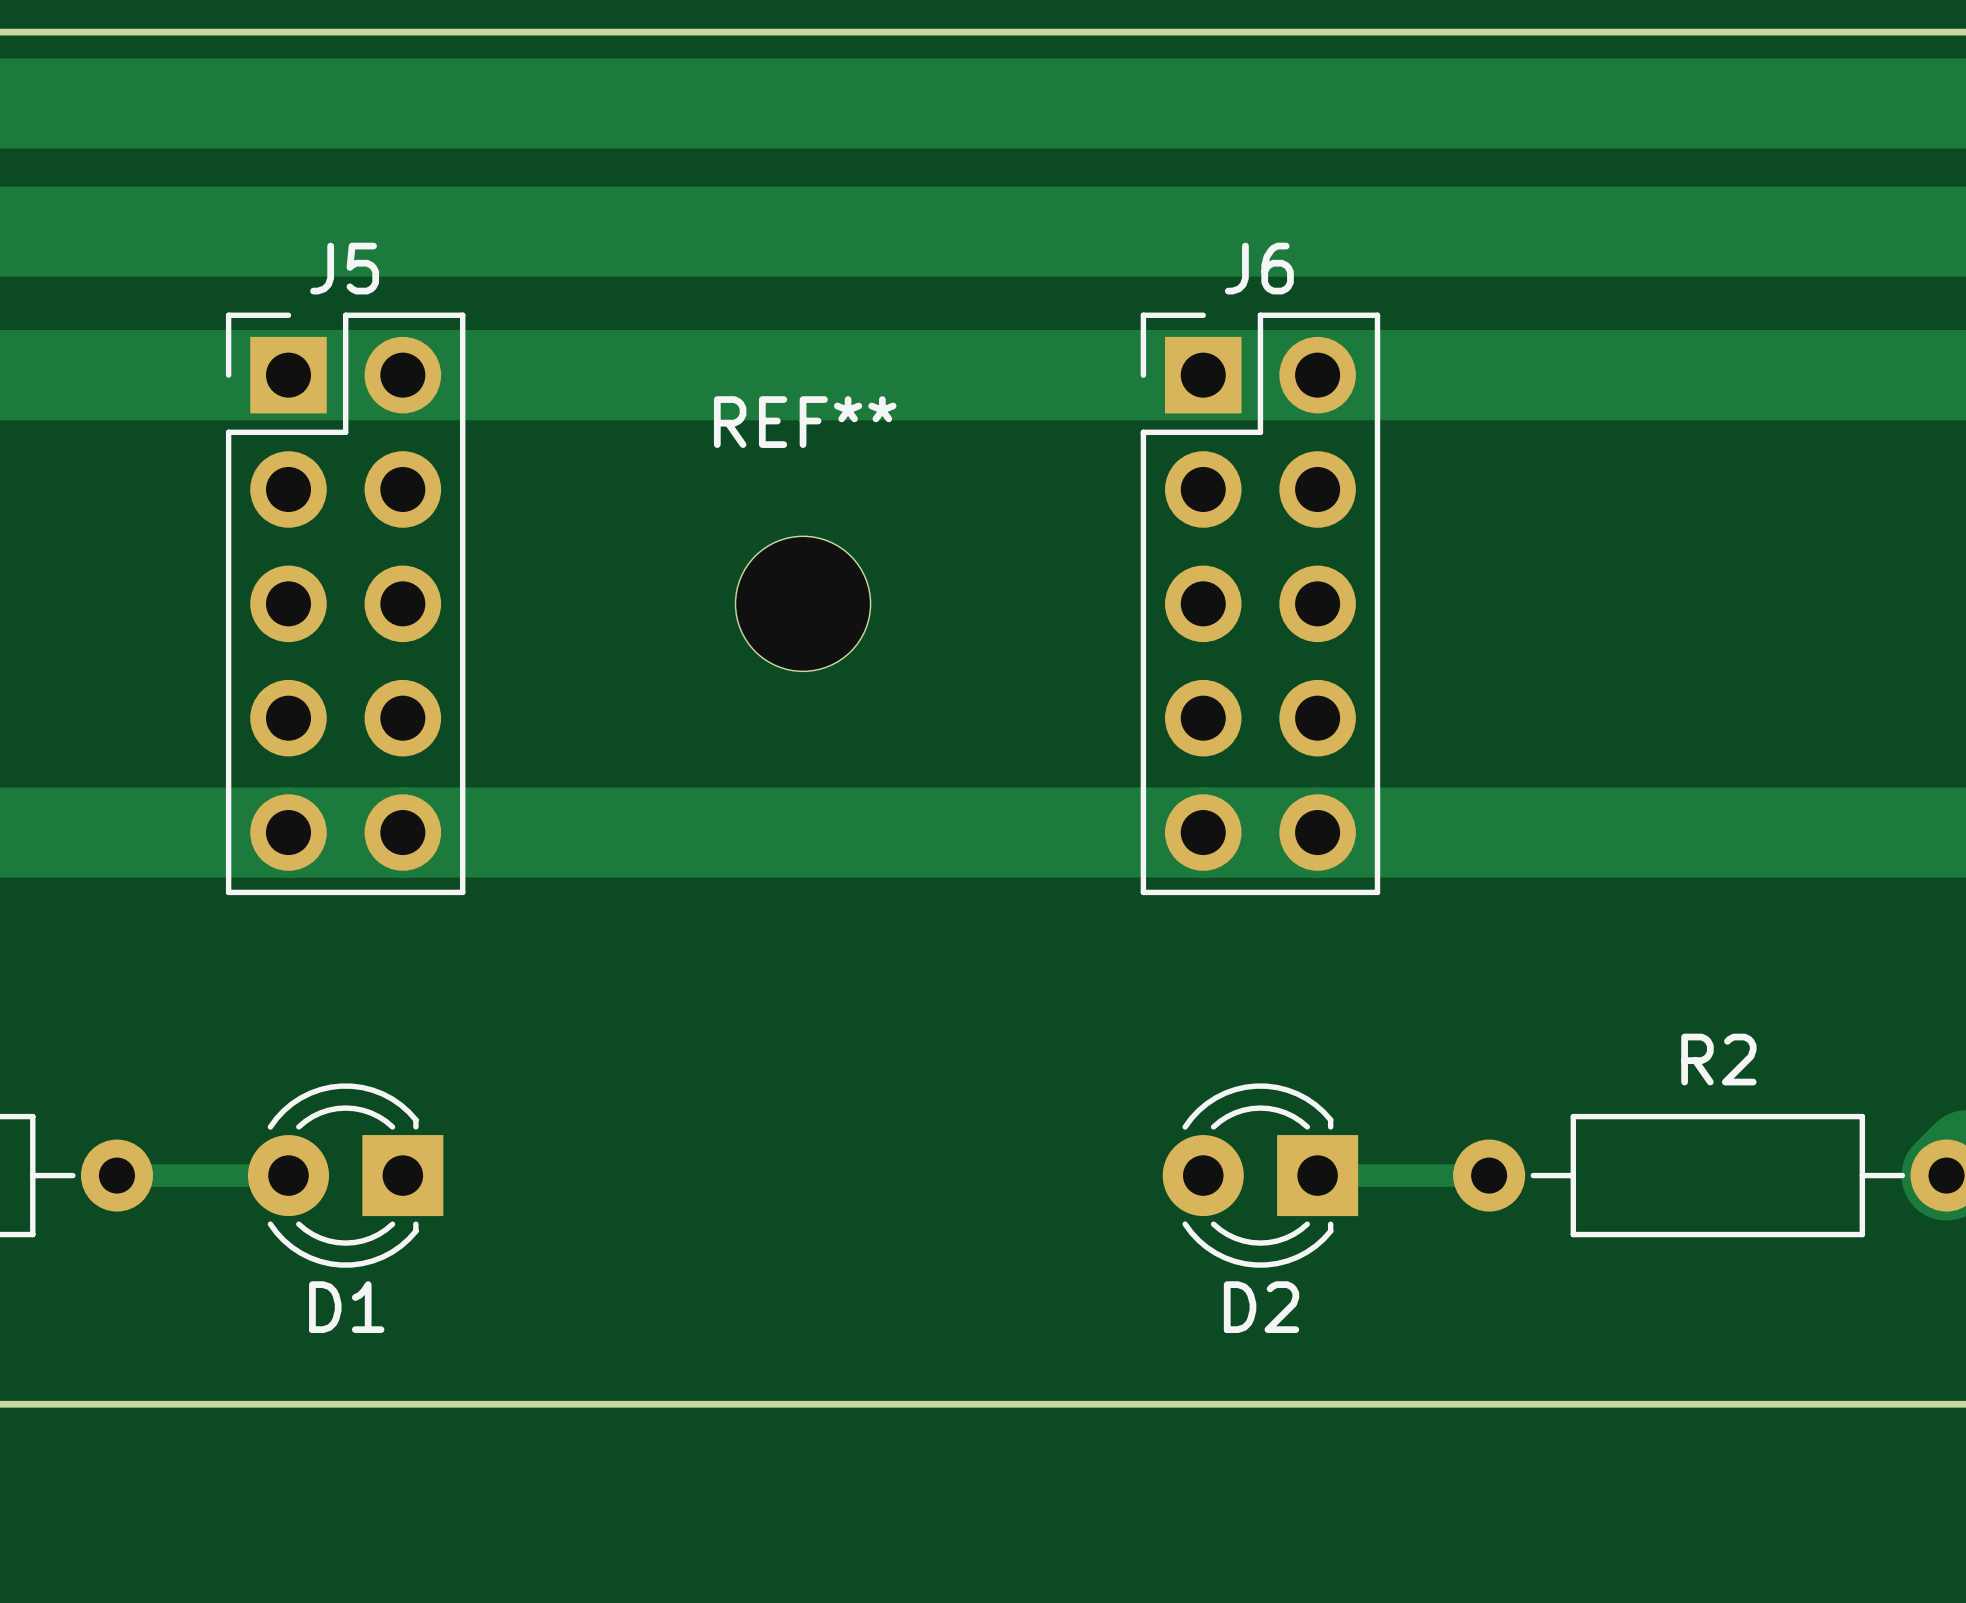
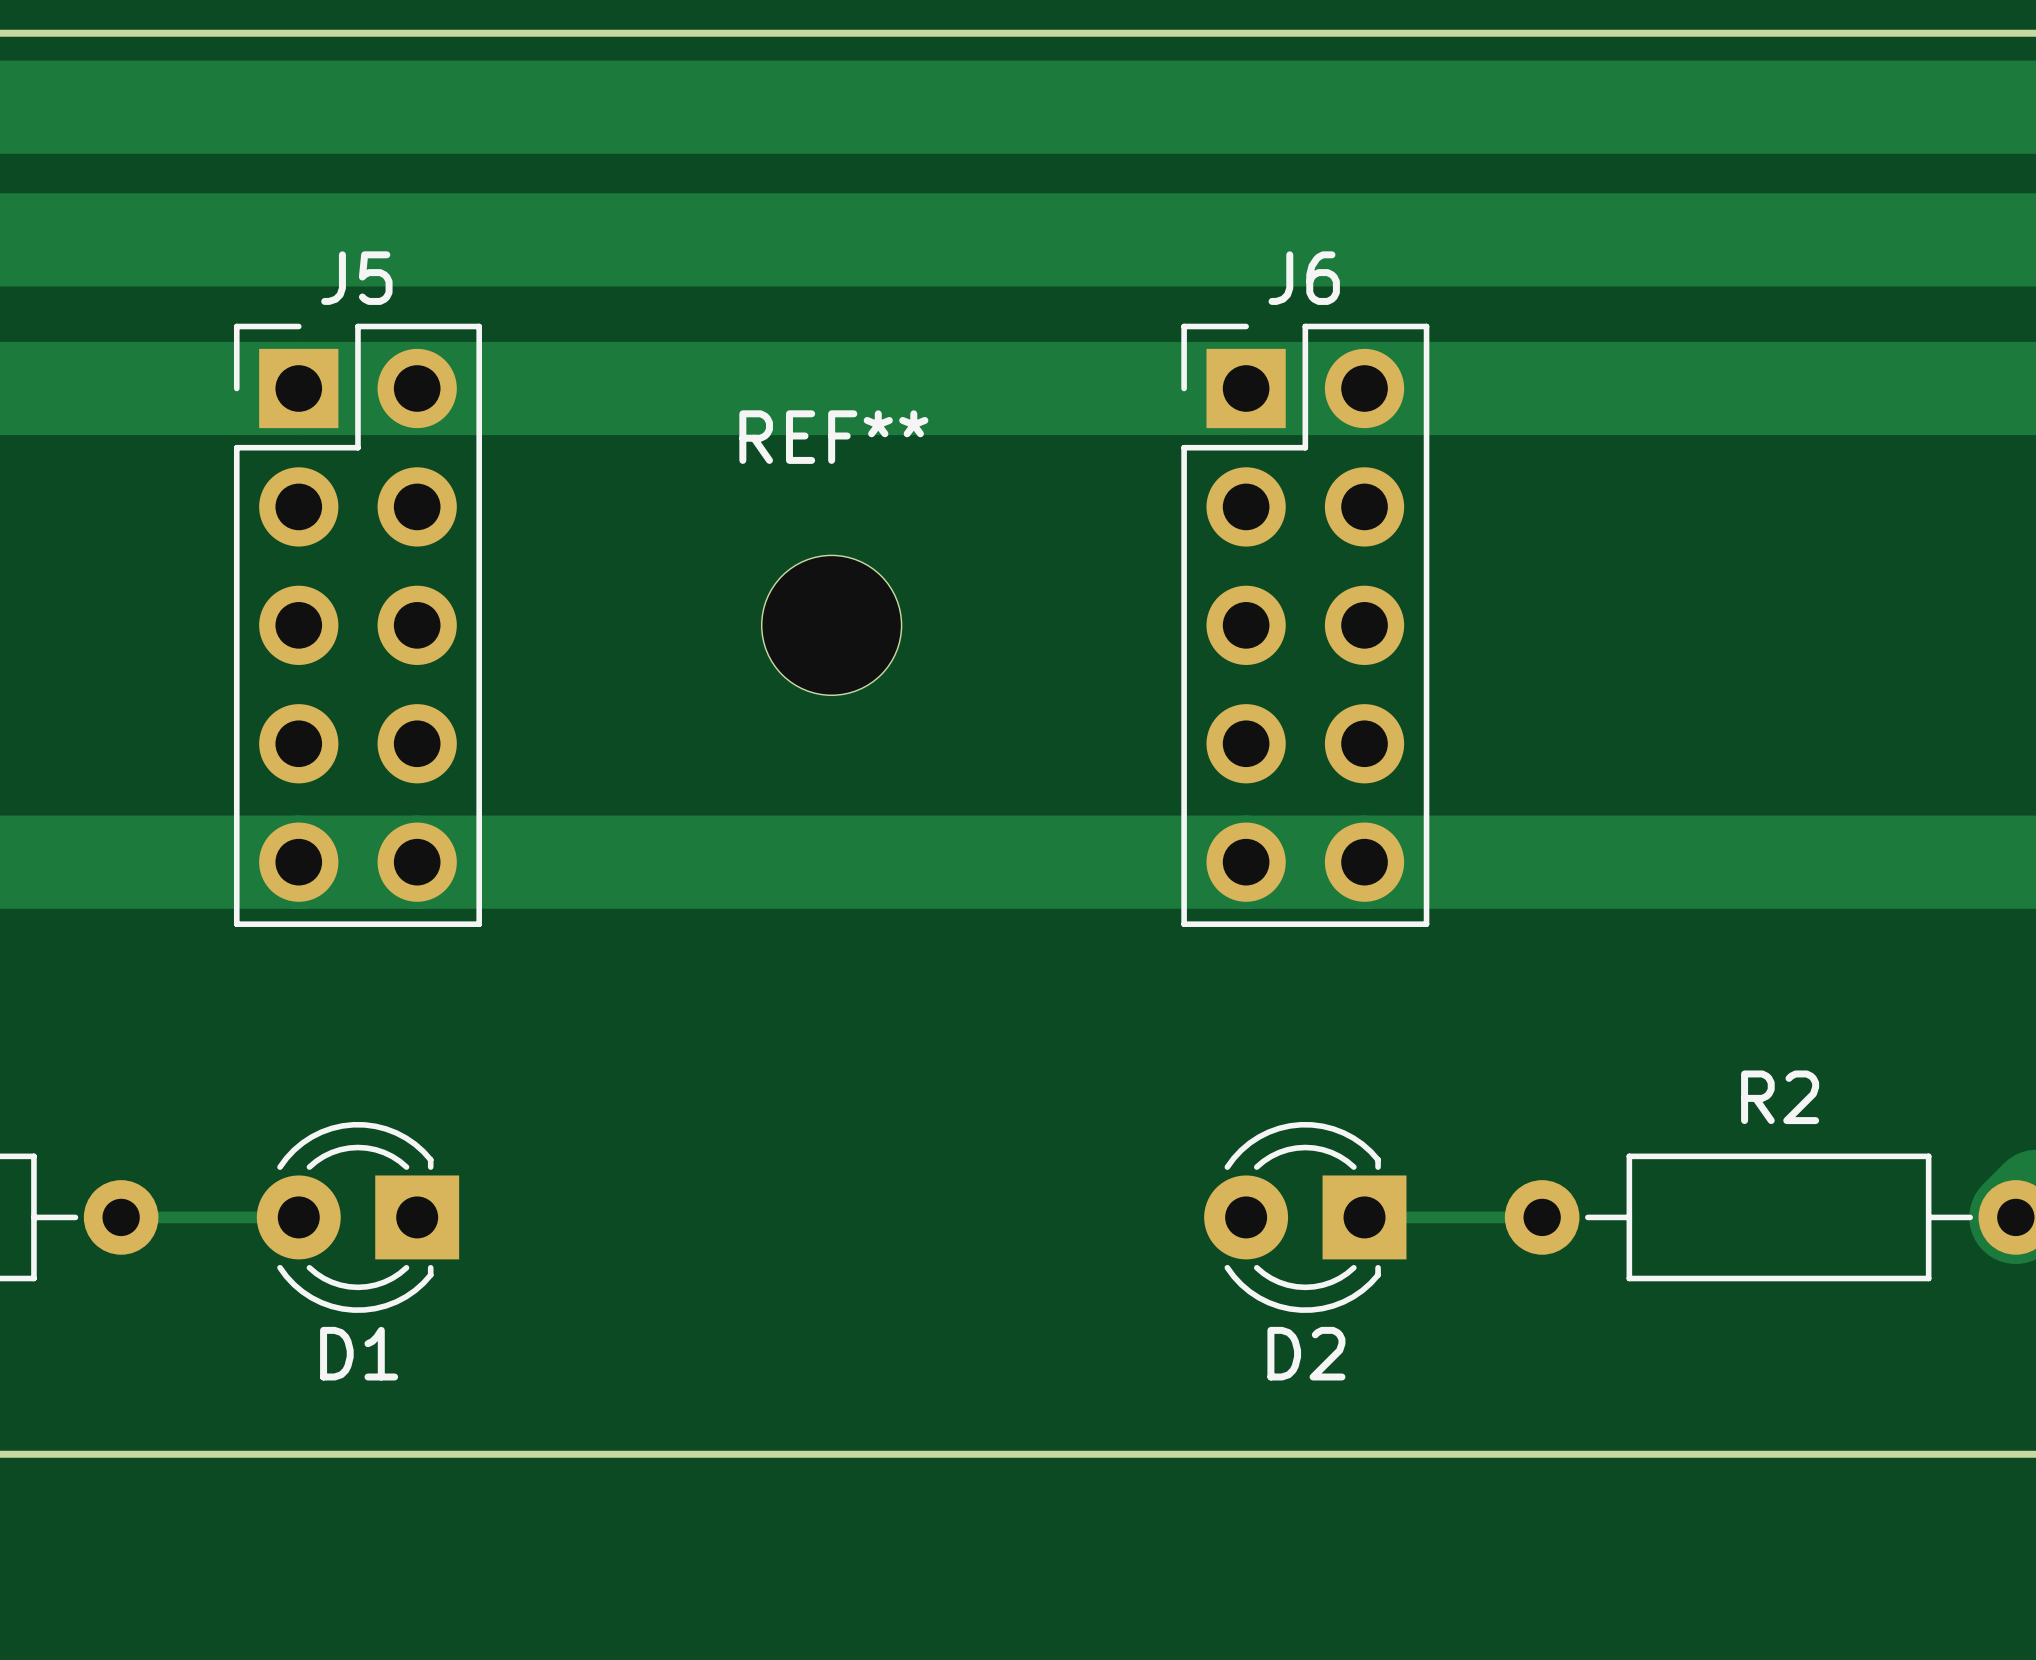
track width: thick (116, 1175) (288, 1175) -> thin (121, 1217) (298, 1217)
track width: thick (1317, 1175) (1489, 1175) -> thin (1364, 1217) (1542, 1217)

